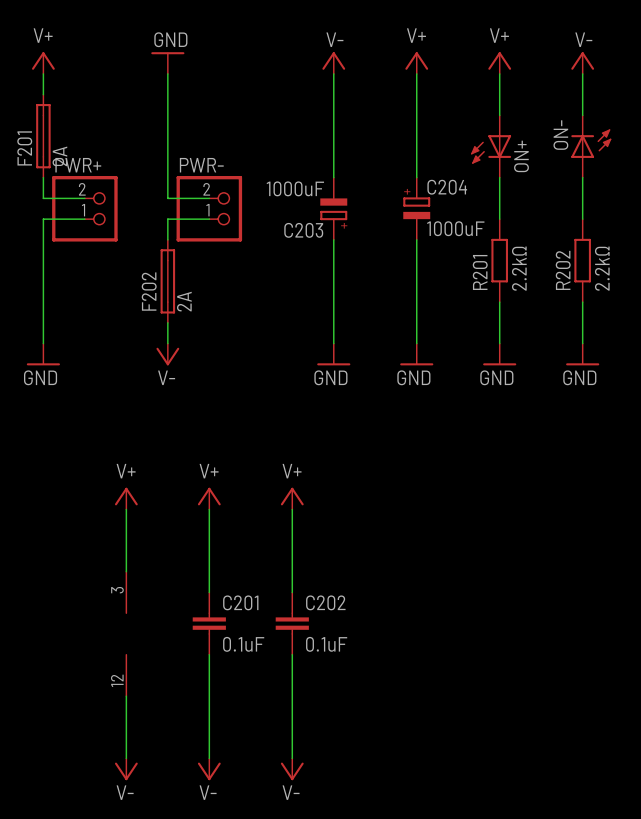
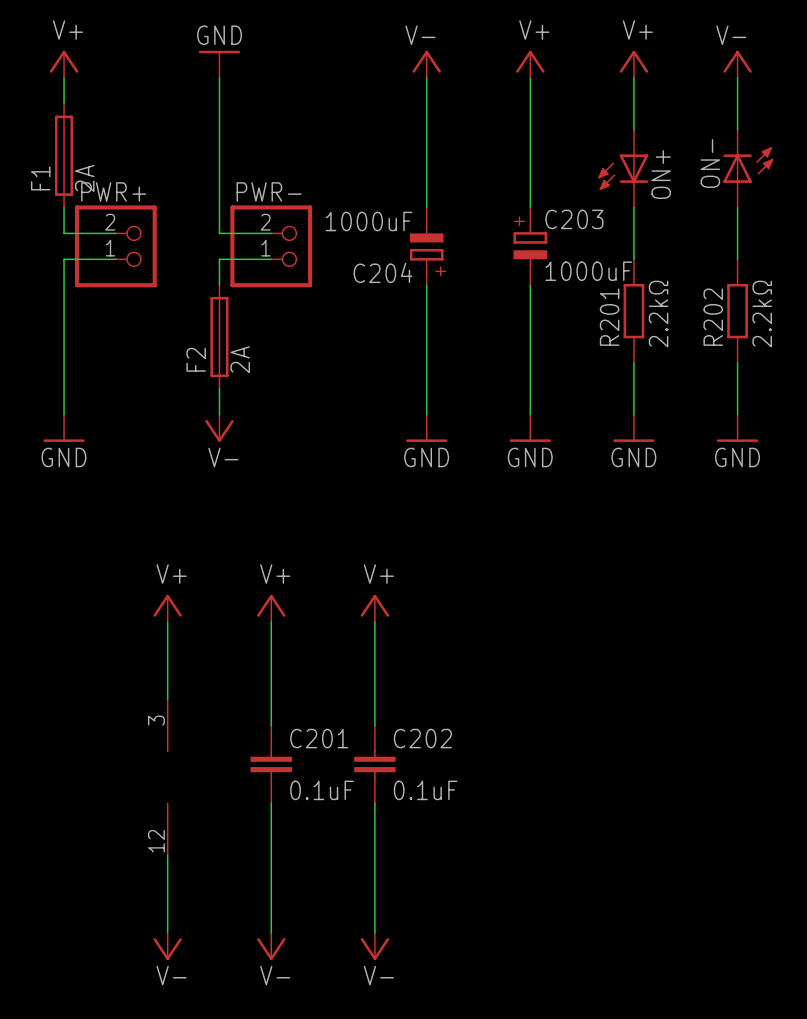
F201 name: F201 (24, 148) -> F1 (40, 178)
C204 name: C204 (447, 187) -> C203 (574, 219)
C203 name: C203 (303, 230) -> C204 (383, 272)
F202 name: F202 (149, 291) -> F2 (196, 359)

